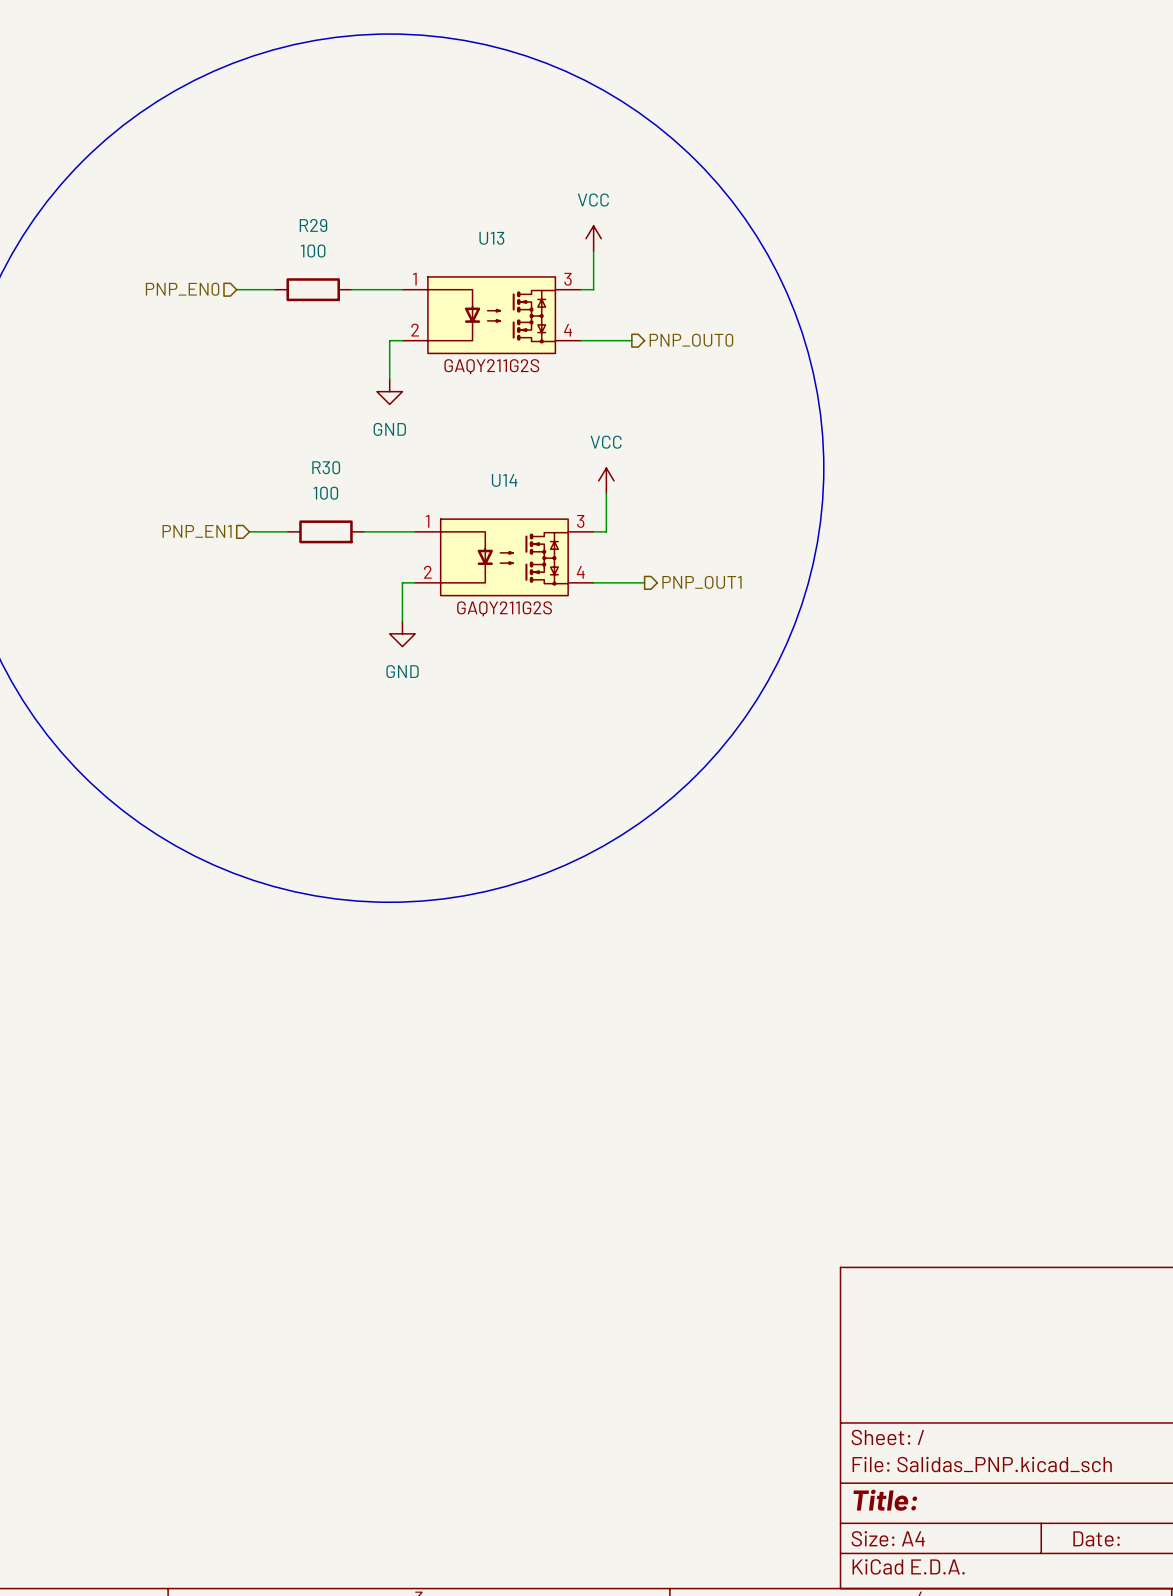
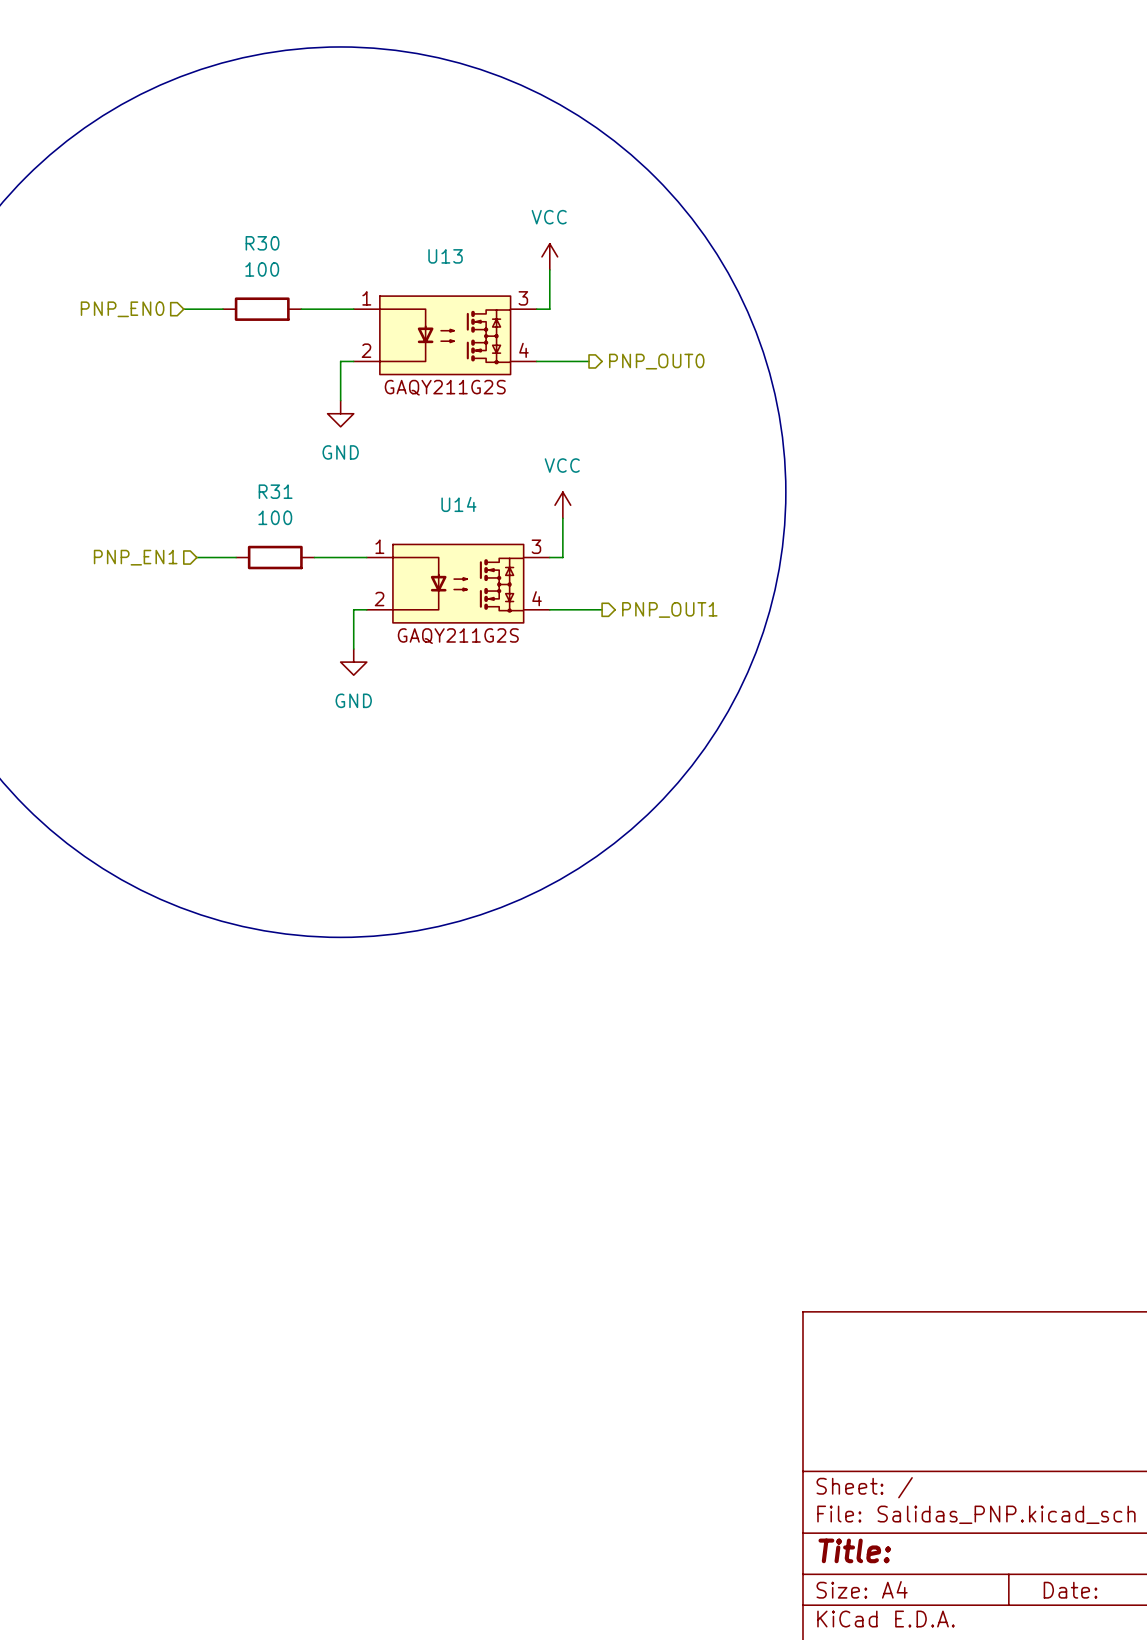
R29 name: R29 (313, 225) -> R30 (262, 243)
R30 name: R30 (326, 467) -> R31 (275, 491)

